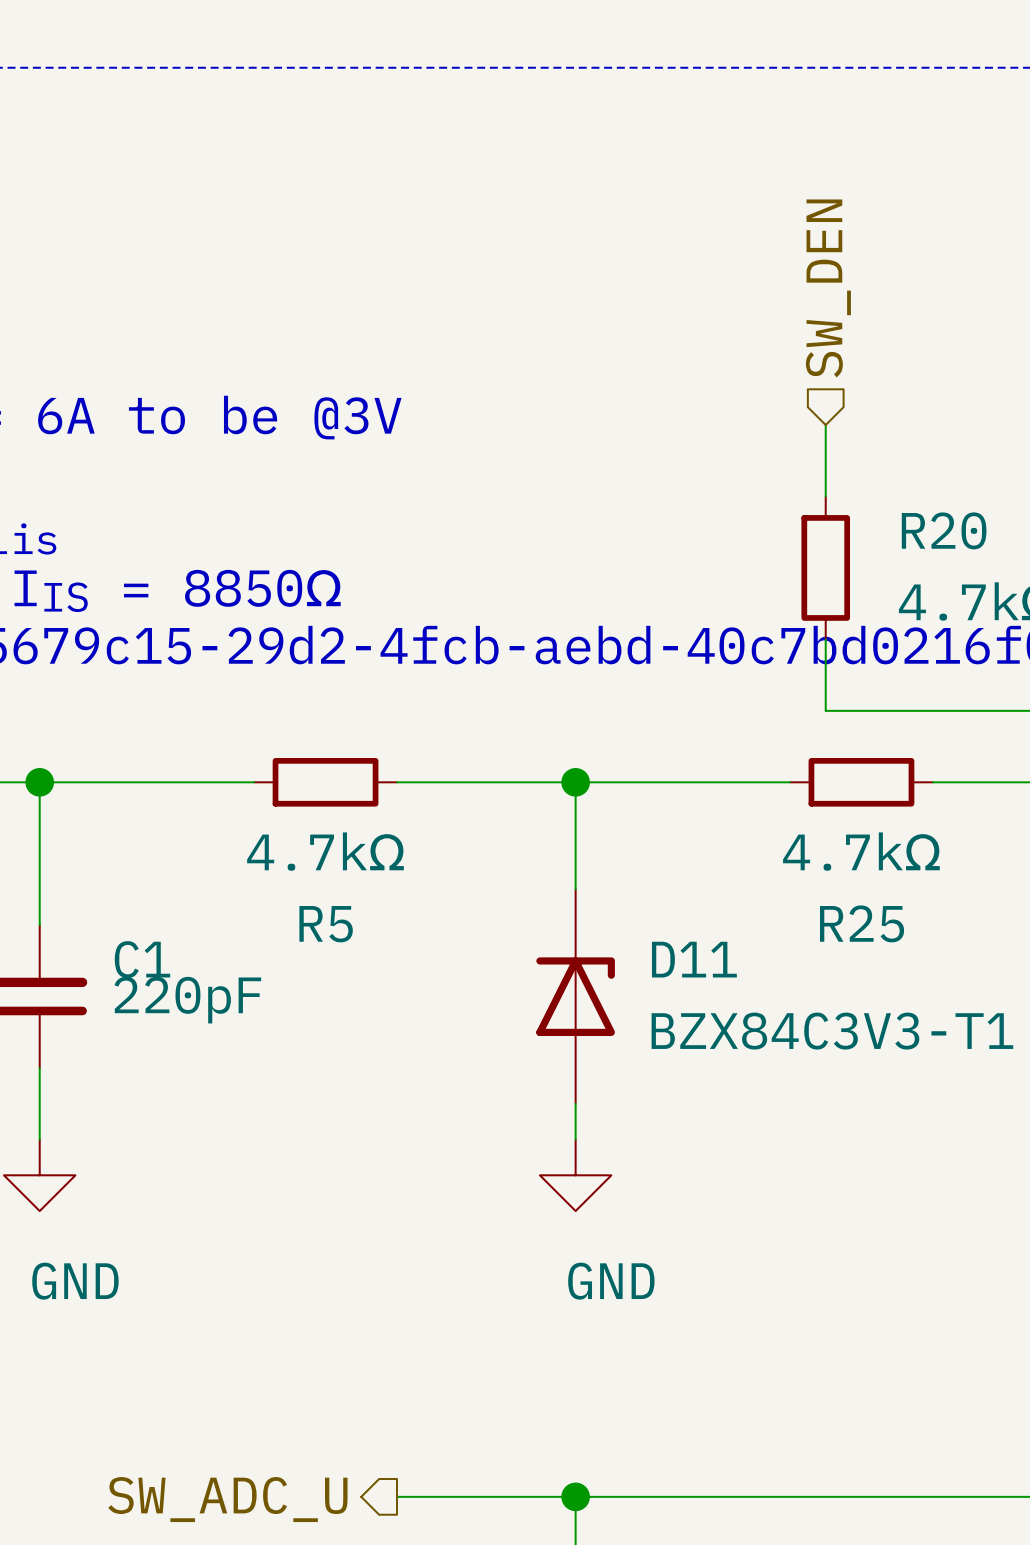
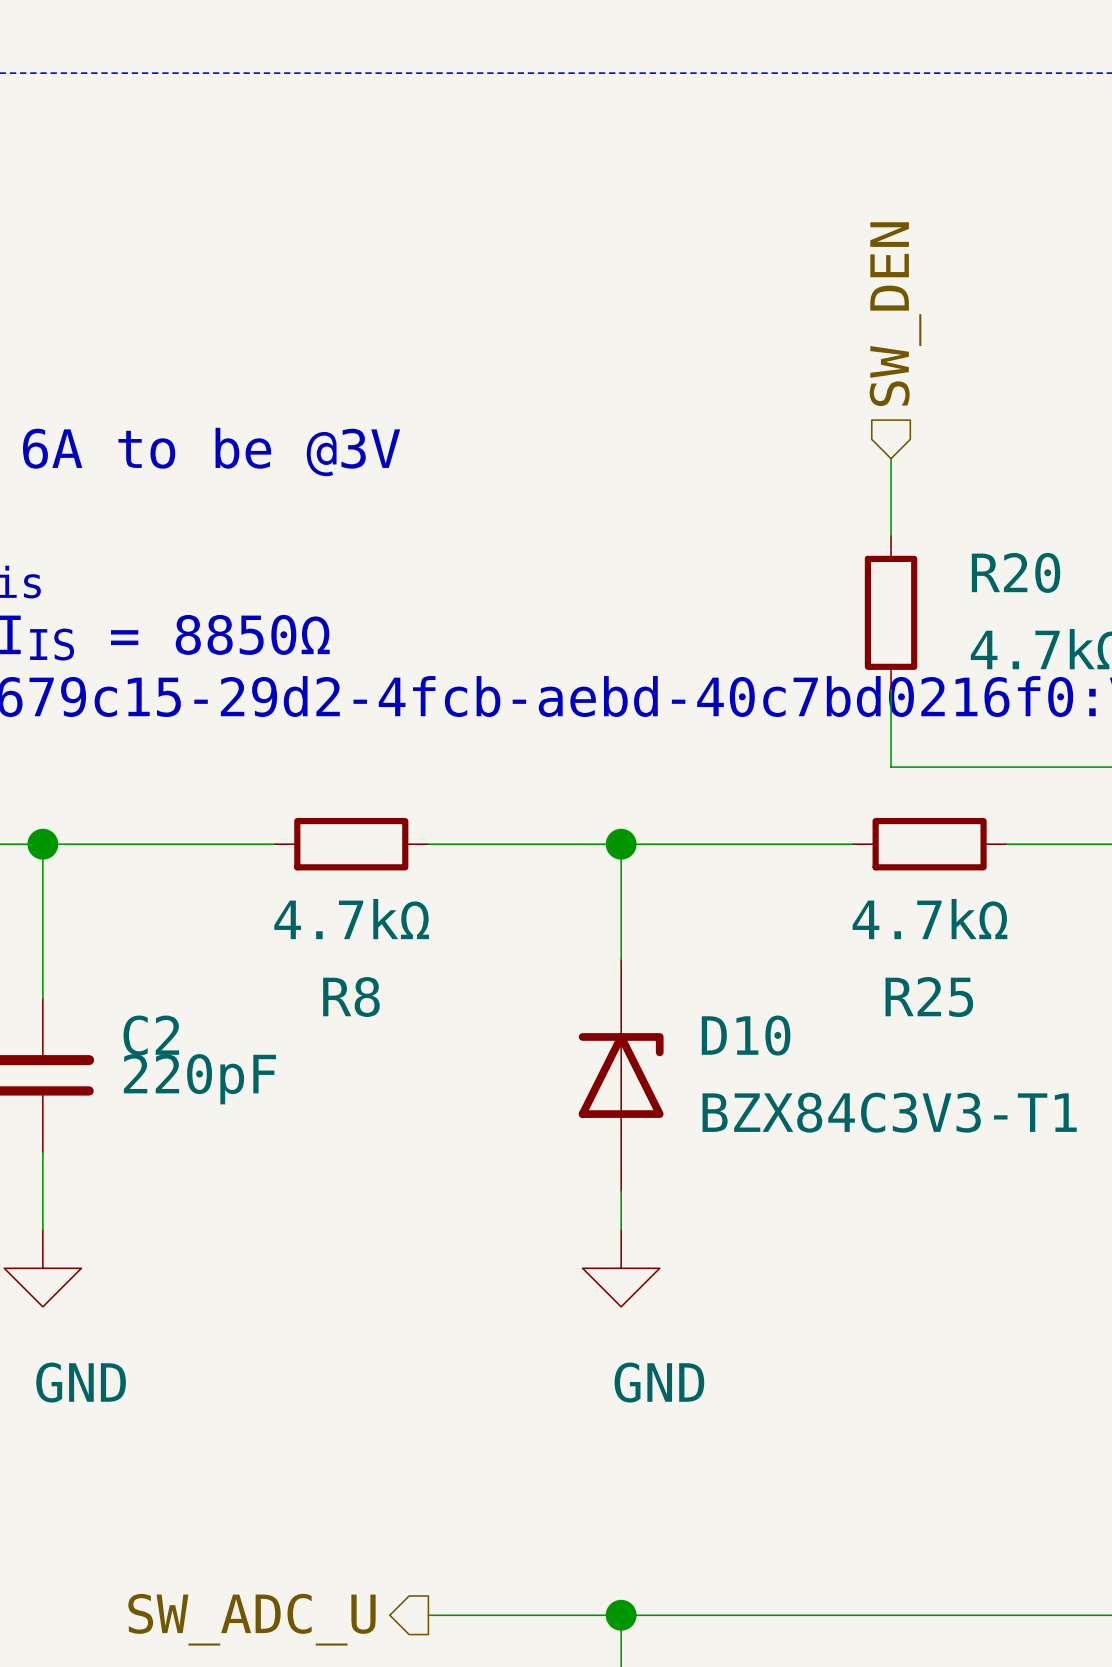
R5 name: R5 (326, 924) -> R8 (351, 997)
C1 name: C1 (142, 959) -> C2 (151, 1035)
D11 name: D11 (694, 959) -> D10 (746, 1035)

